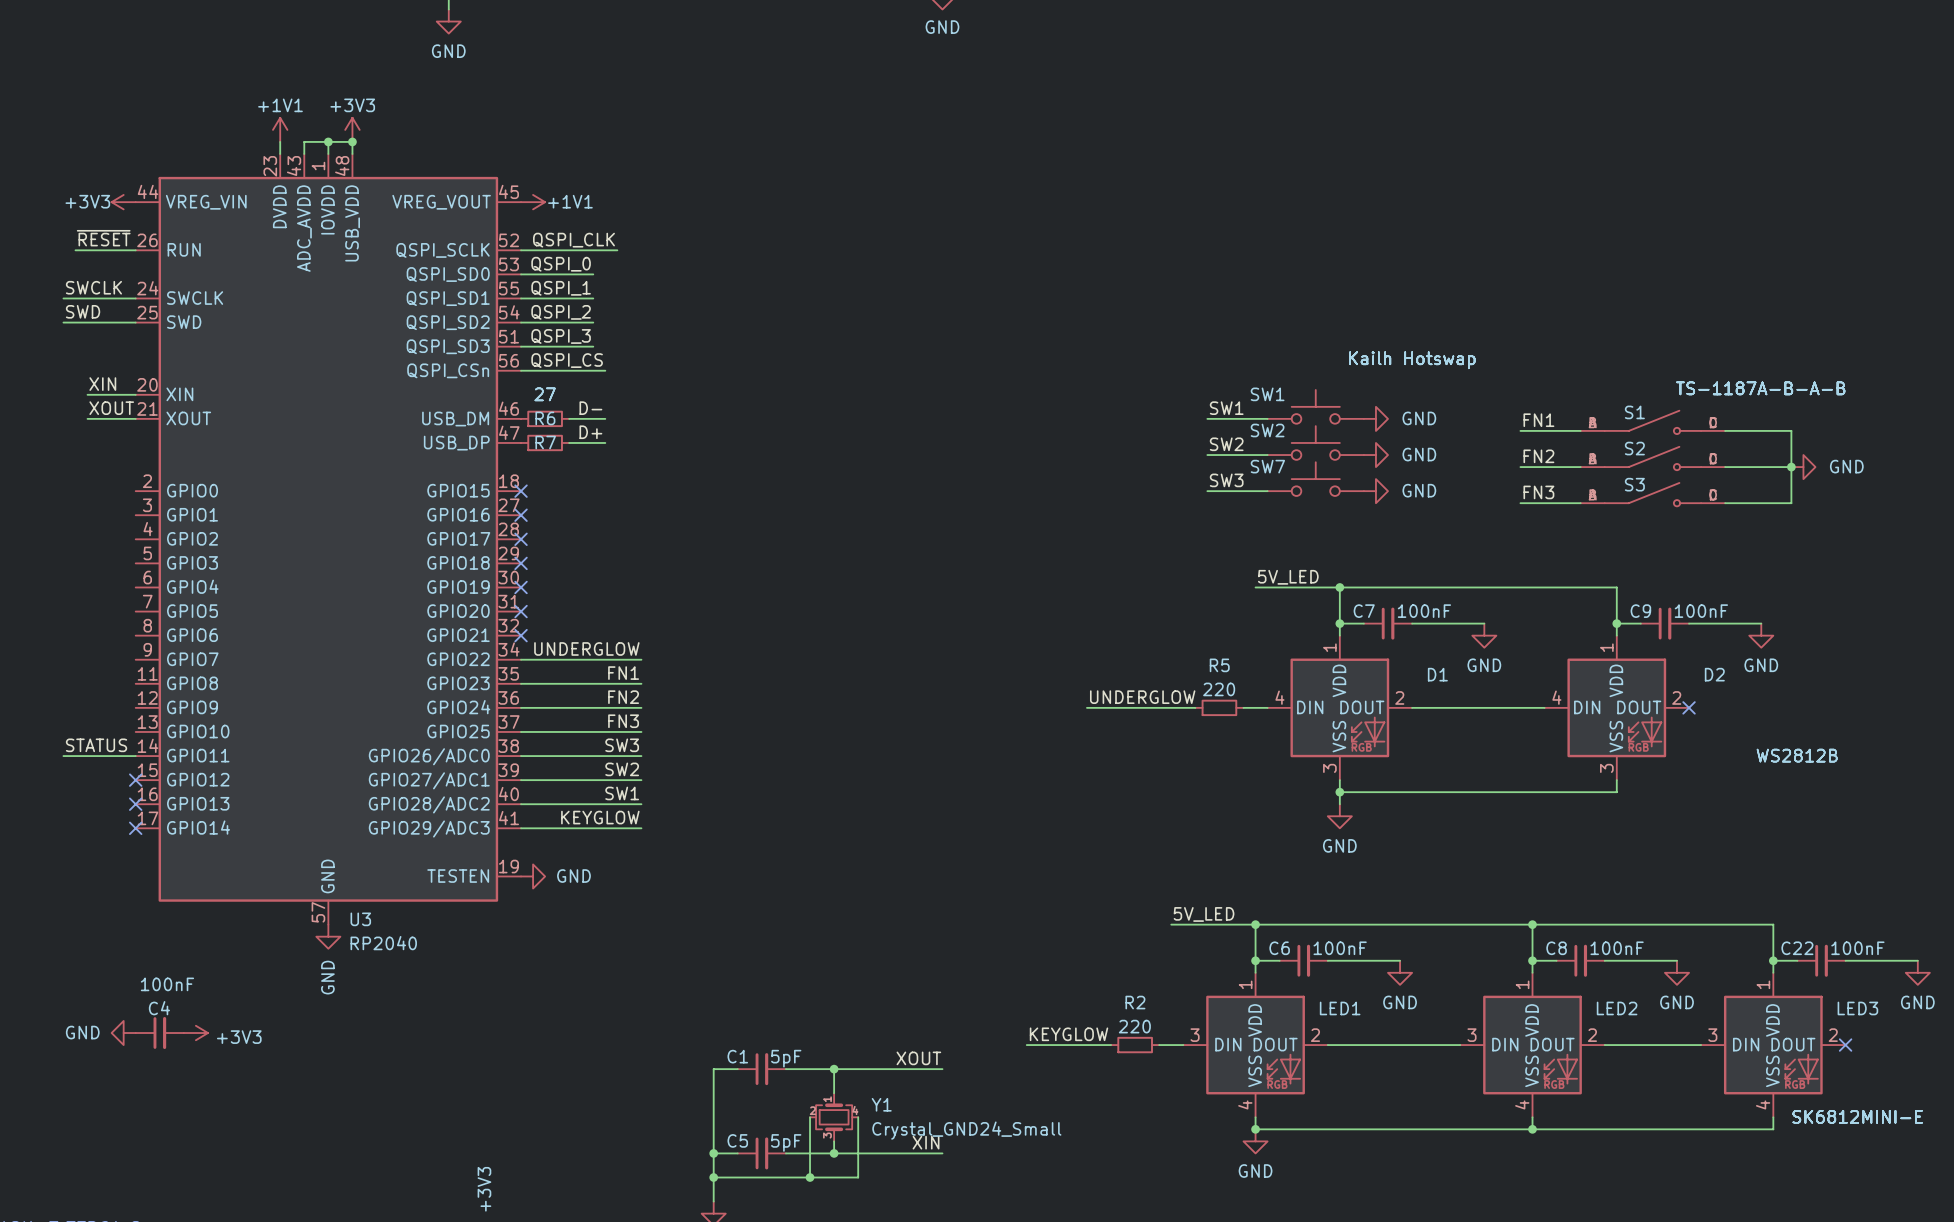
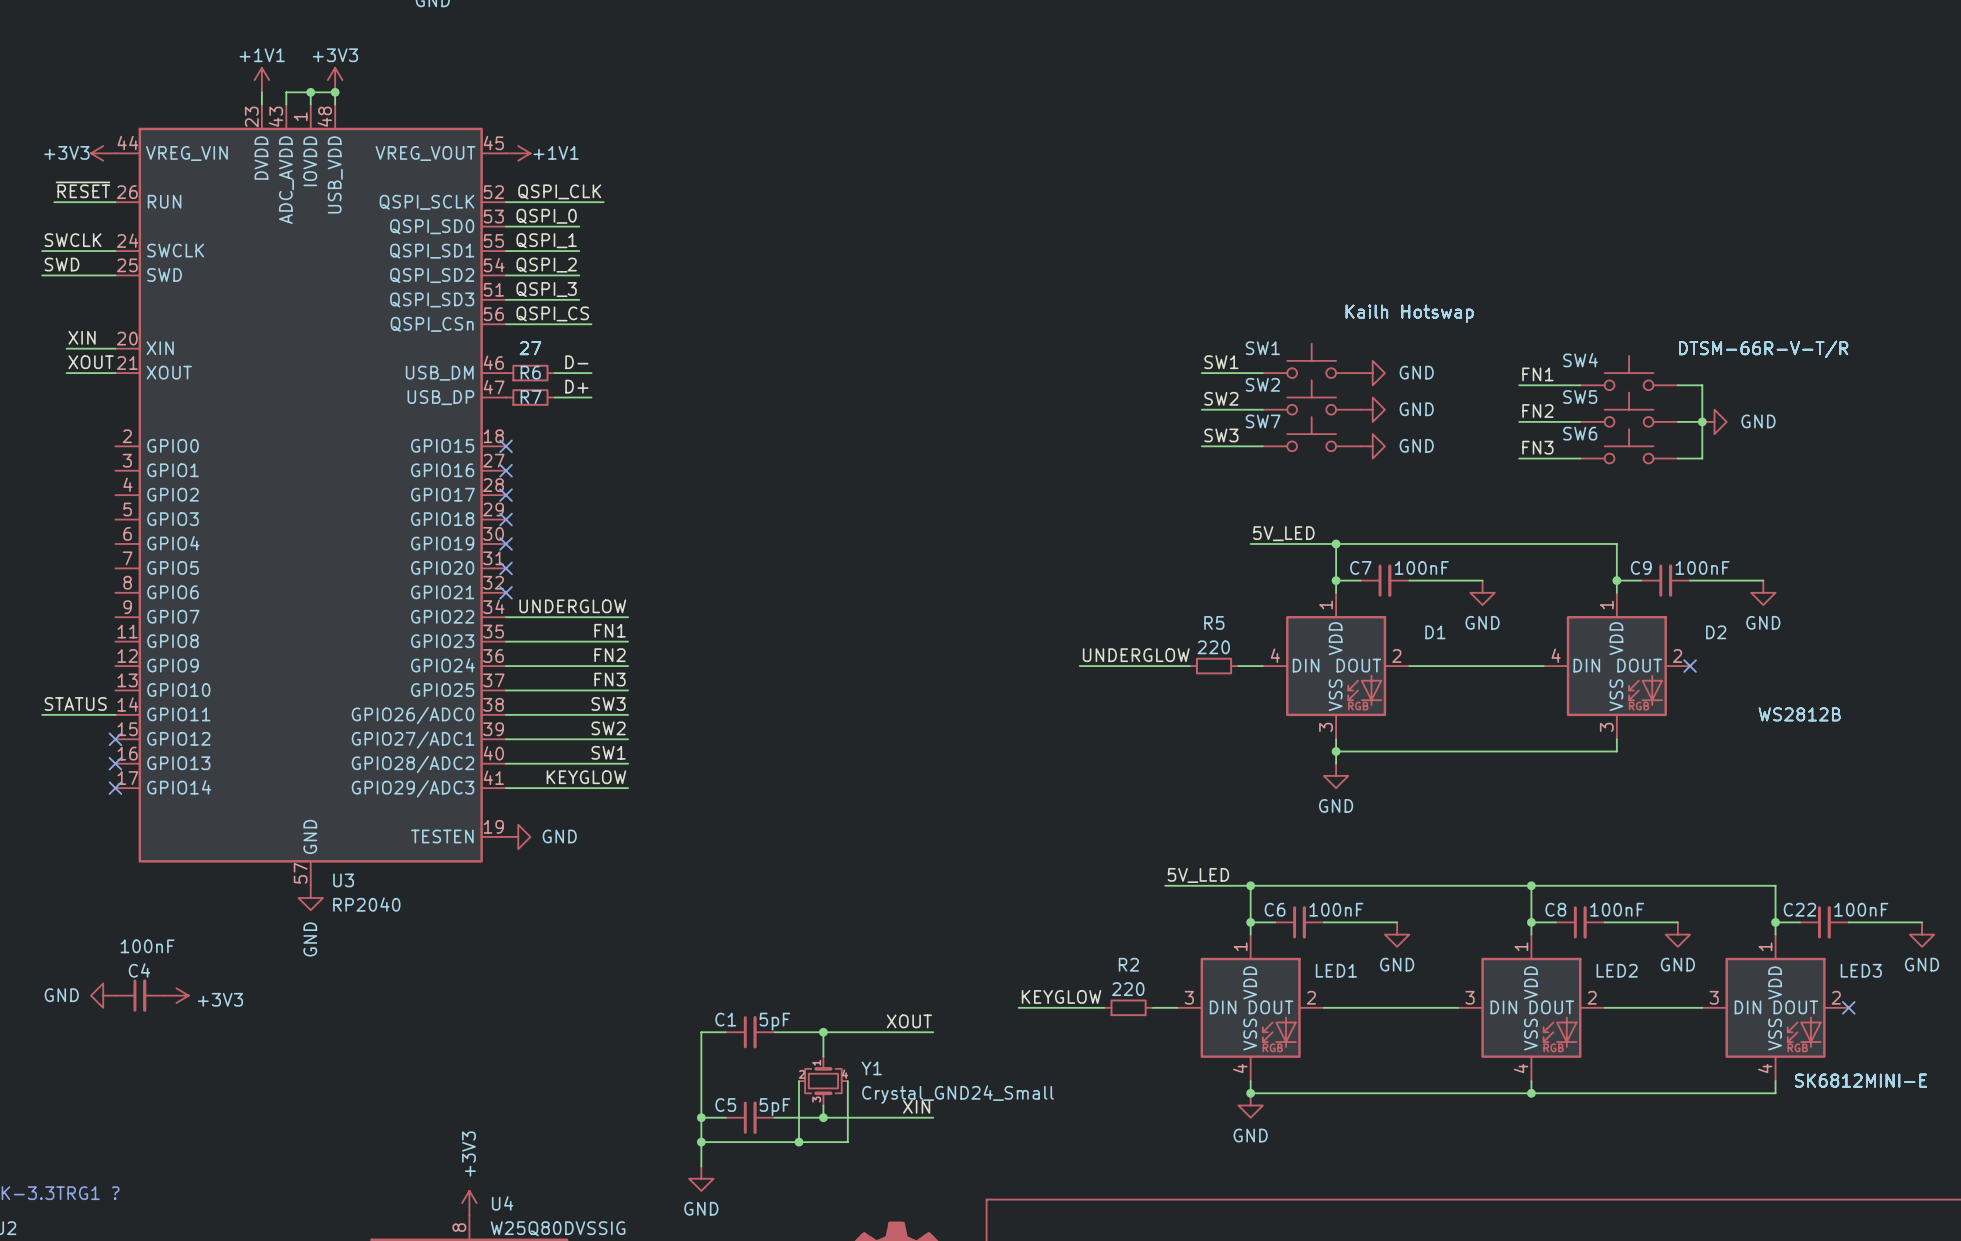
SW4: none -> DTSM-66R-V-T/R (1629, 373)
S1: TS-1187A-B-A-B (1652, 422) -> none
wire: none -> (1677, 385) (1702, 385) (1702, 458) (1677, 458)
wire: (1725, 430) (1791, 430) (1791, 503) (1725, 503) -> none
SW5: none -> DTSM-66R-V-T/R (1629, 409)
S2: TS-1187A-B-A-B (1652, 458) -> none
junction: none -> (1702, 421)
wire: (1725, 467) (1791, 467) -> none
junction: (1791, 467) -> none
power symbol position: GND (1803, 467) -> GND (1714, 421)
SW6: none -> DTSM-66R-V-T/R (1629, 446)
S3: TS-1187A-B-A-B (1652, 494) -> none

